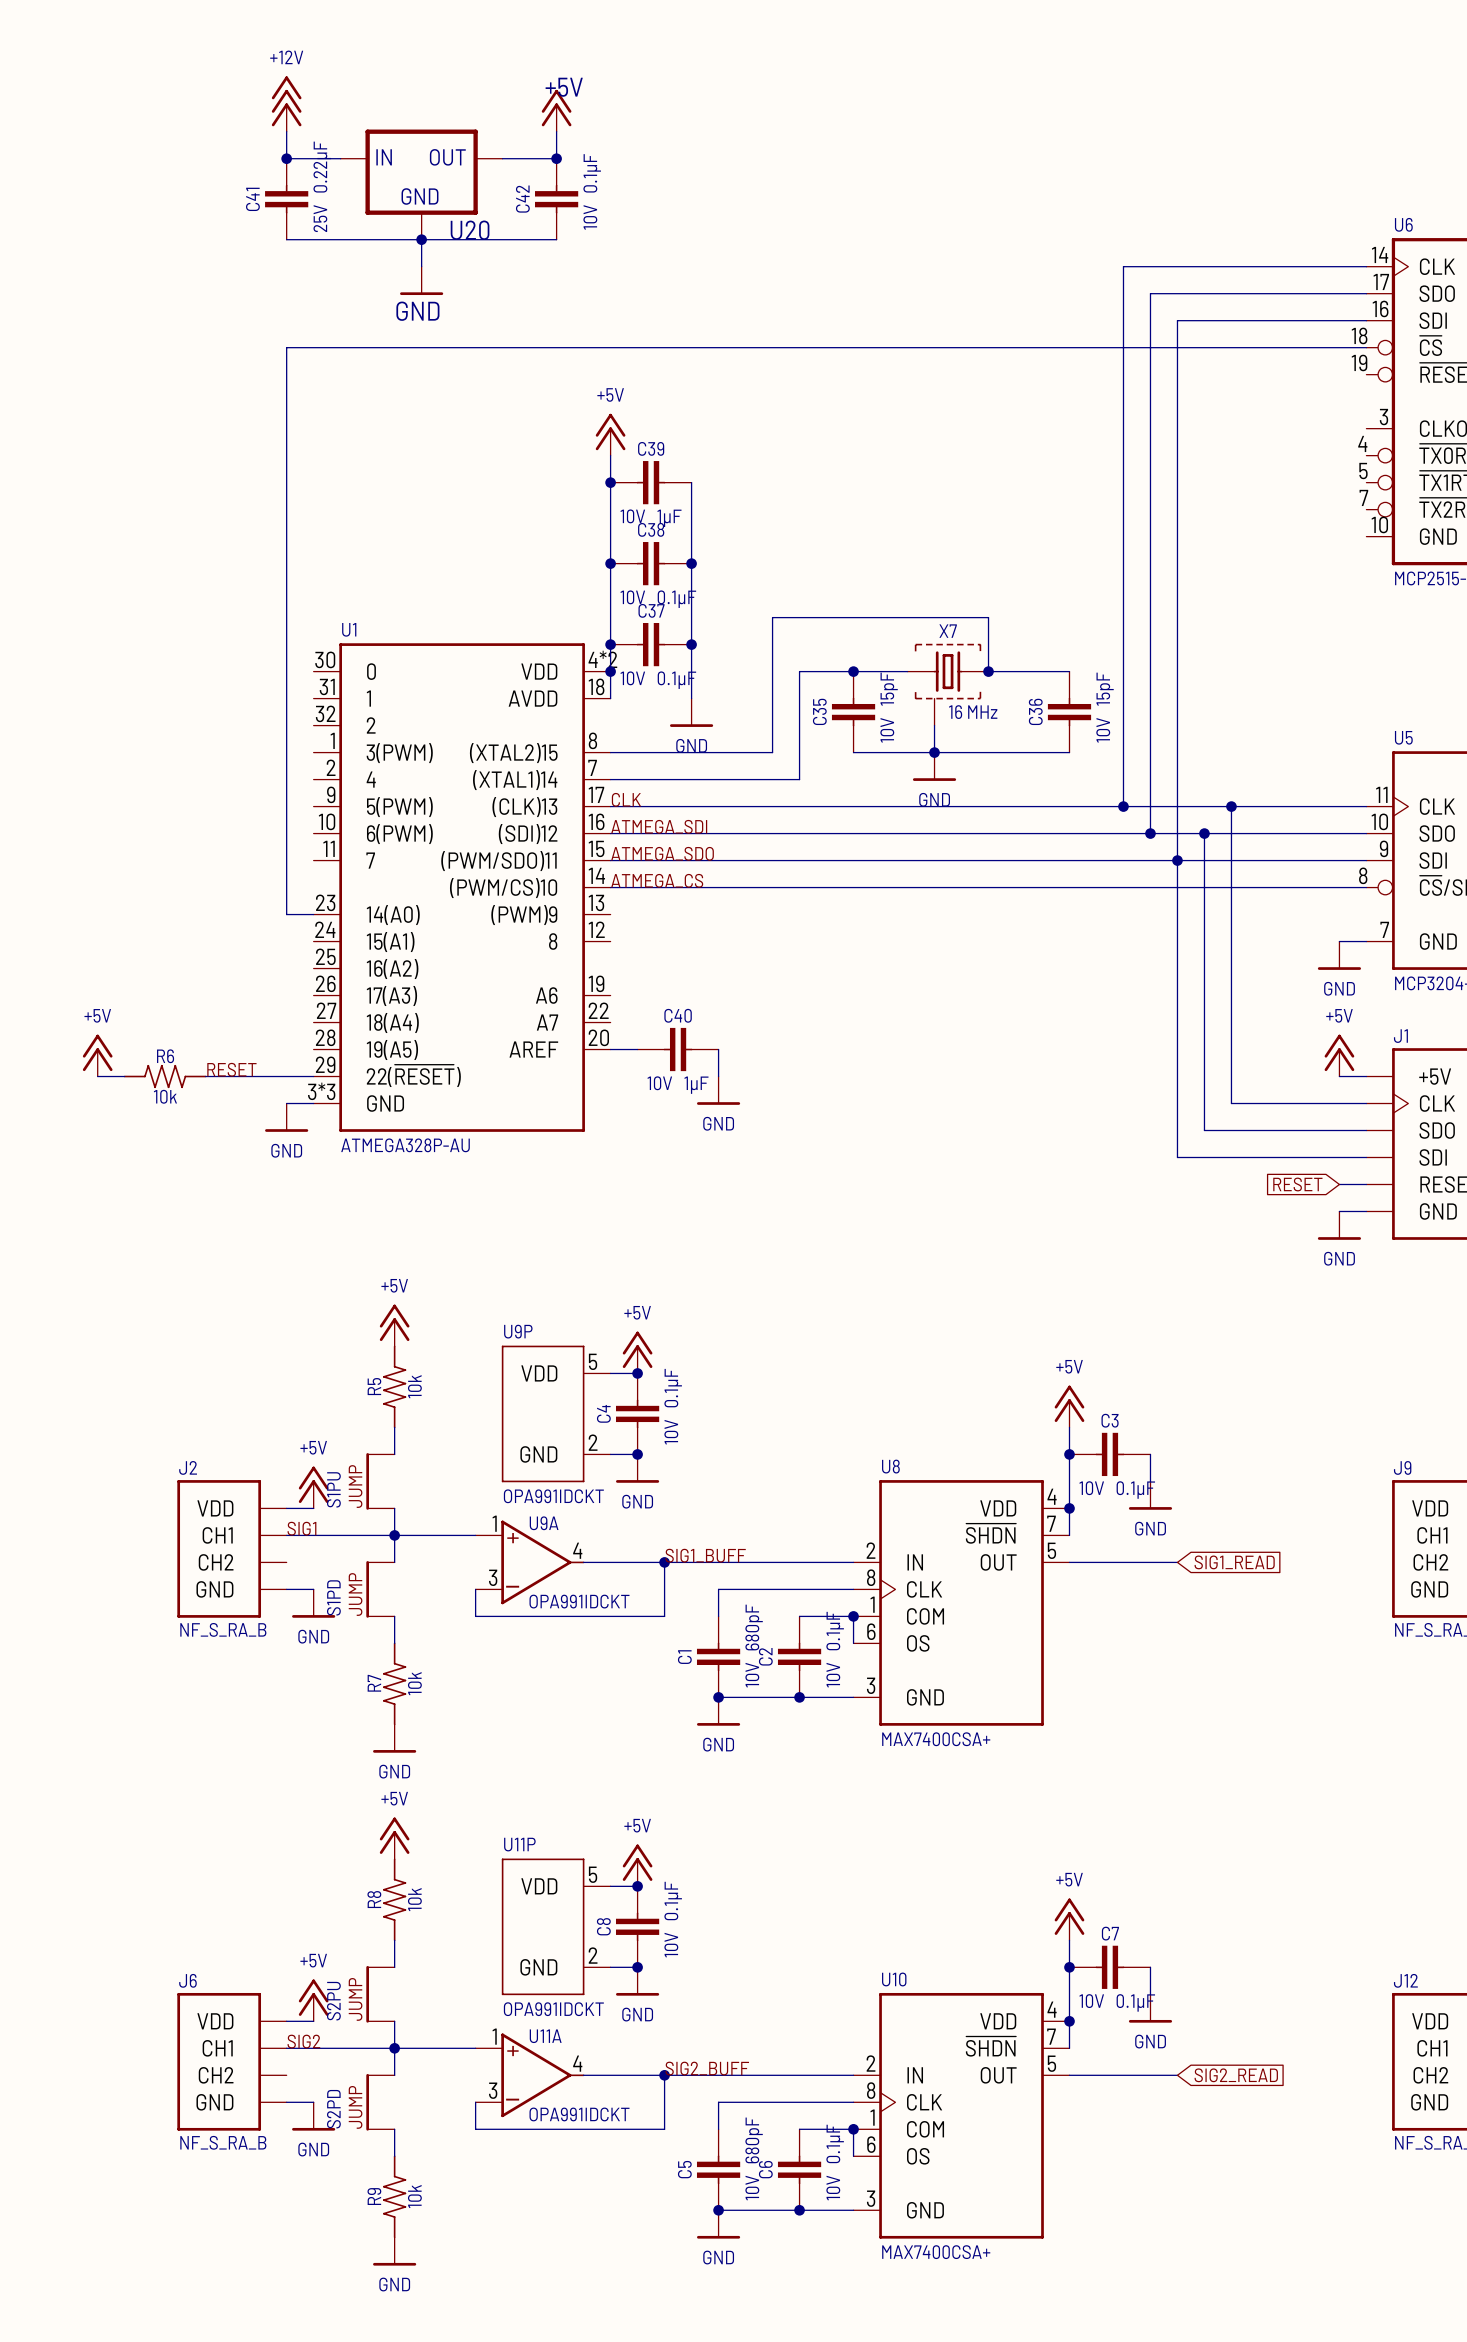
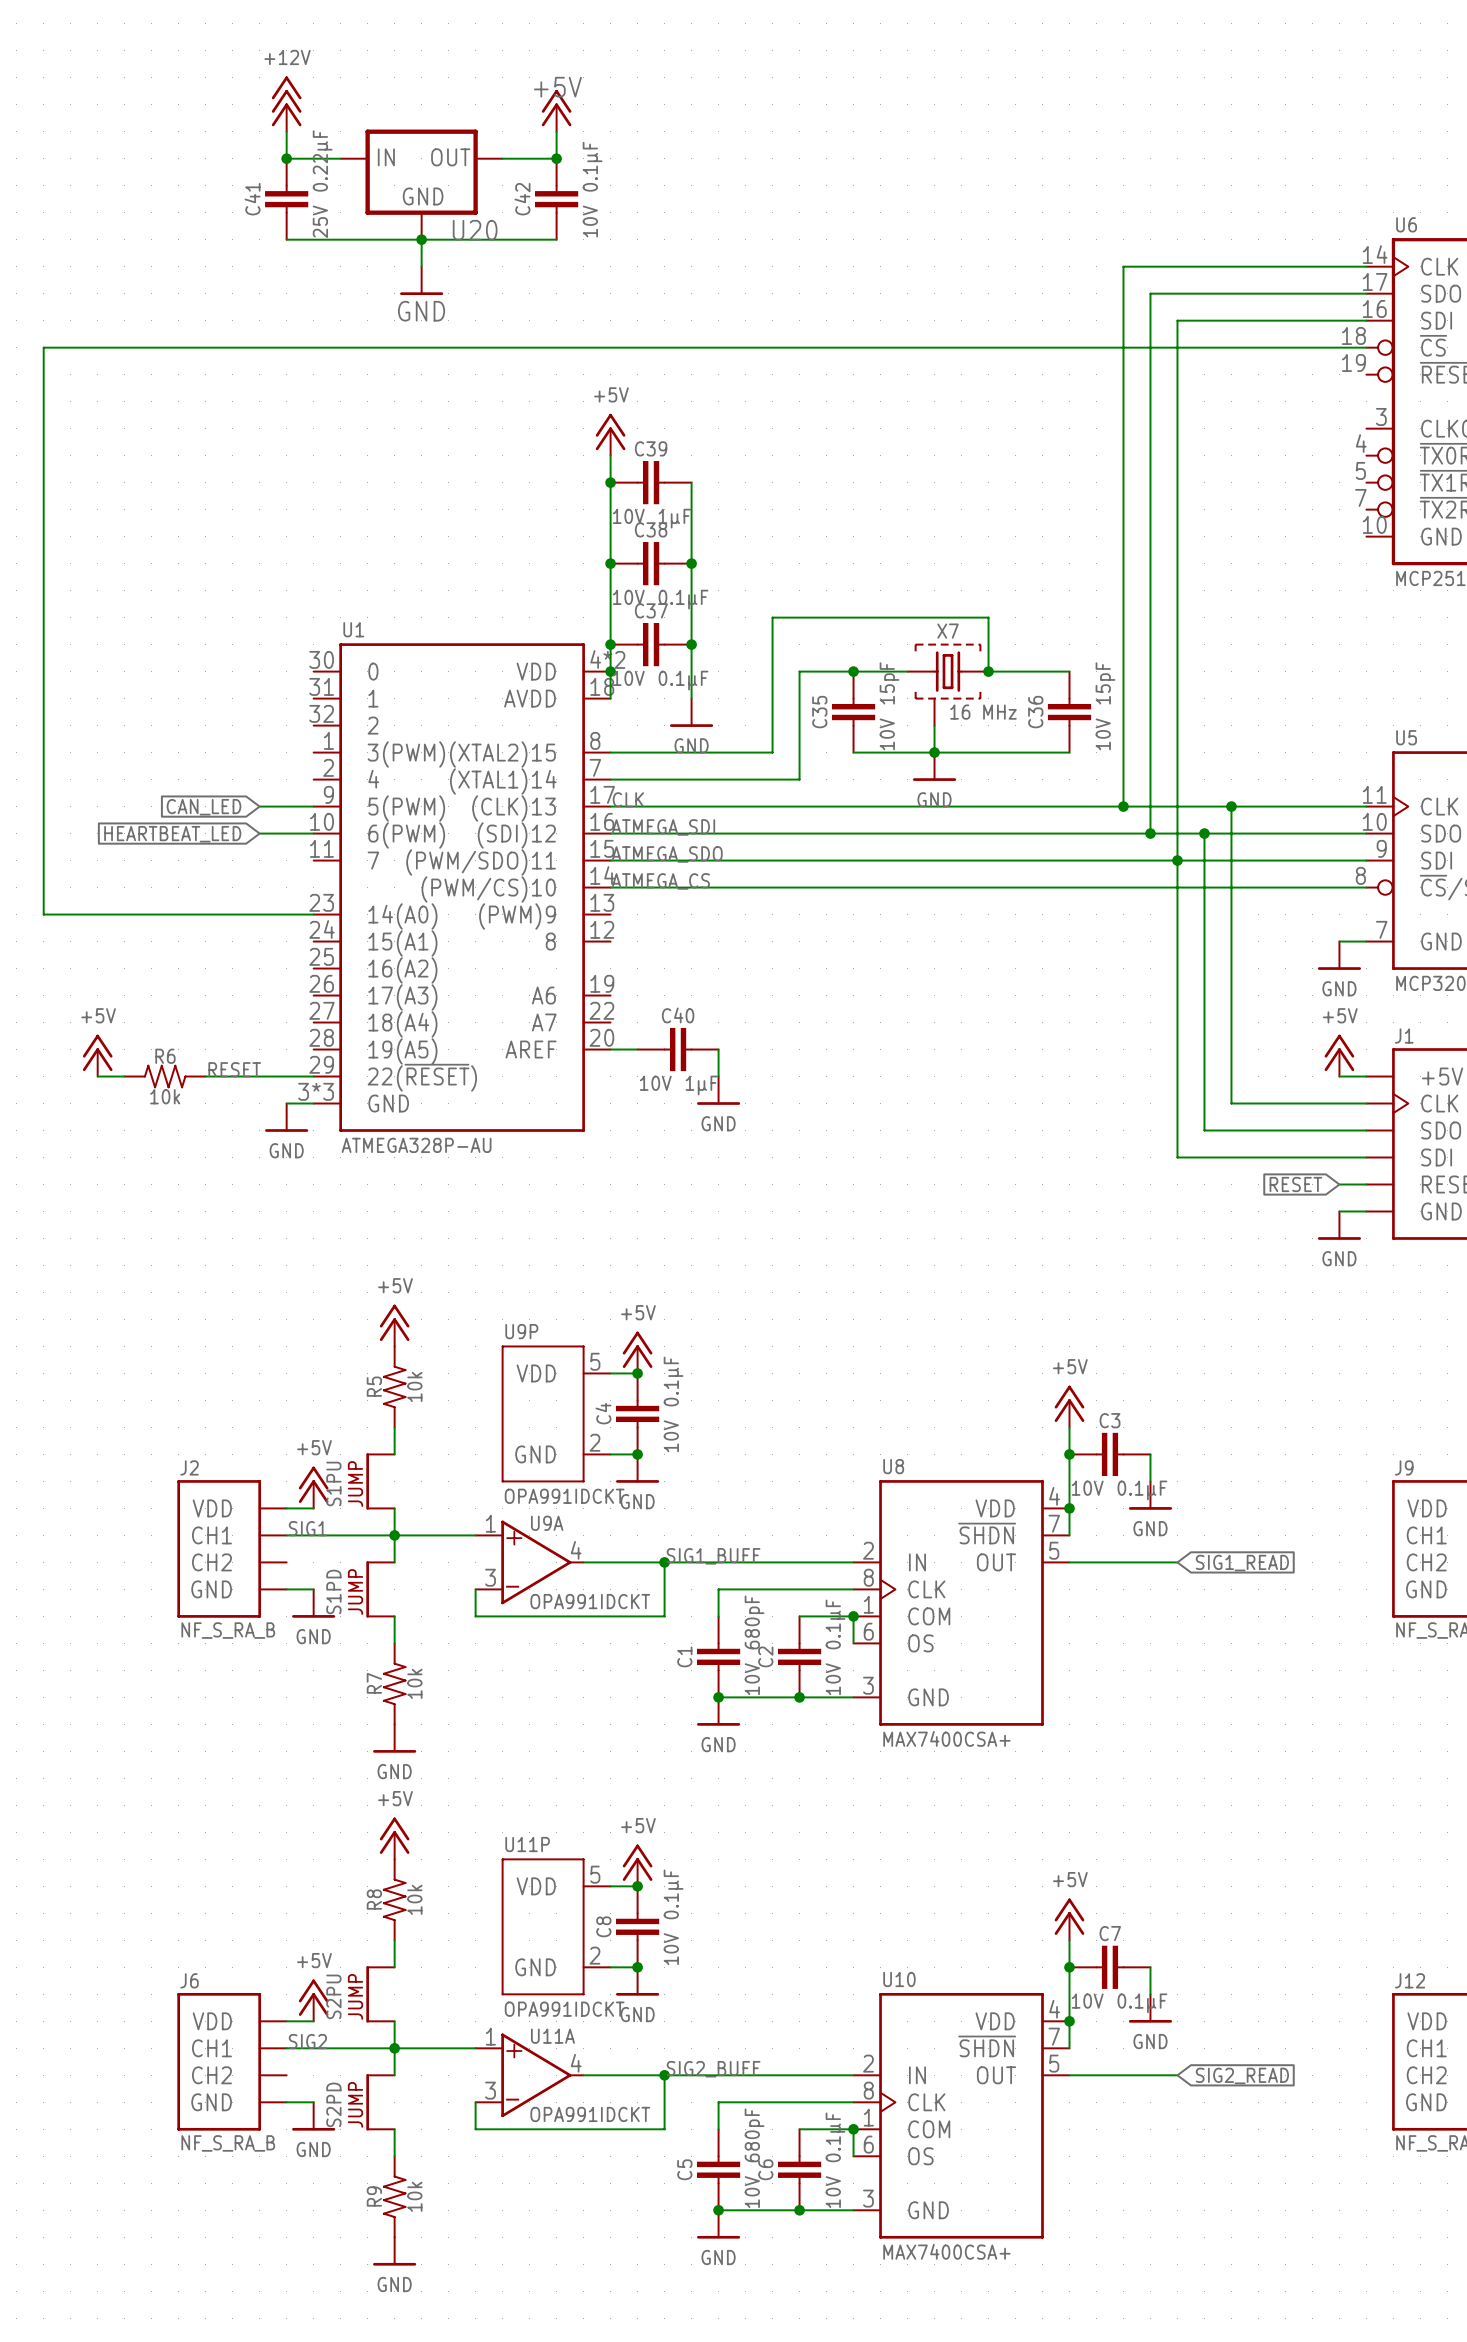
wire: (286, 347) (286, 914) -> (286, 347) (43, 347) (43, 914) (286, 914)
global label: none -> CAN_LED (203, 807)
wire: none -> (259, 806) (313, 806)
global label: none -> HEARTBEAT_LED (172, 834)
wire: none -> (259, 833) (313, 833)

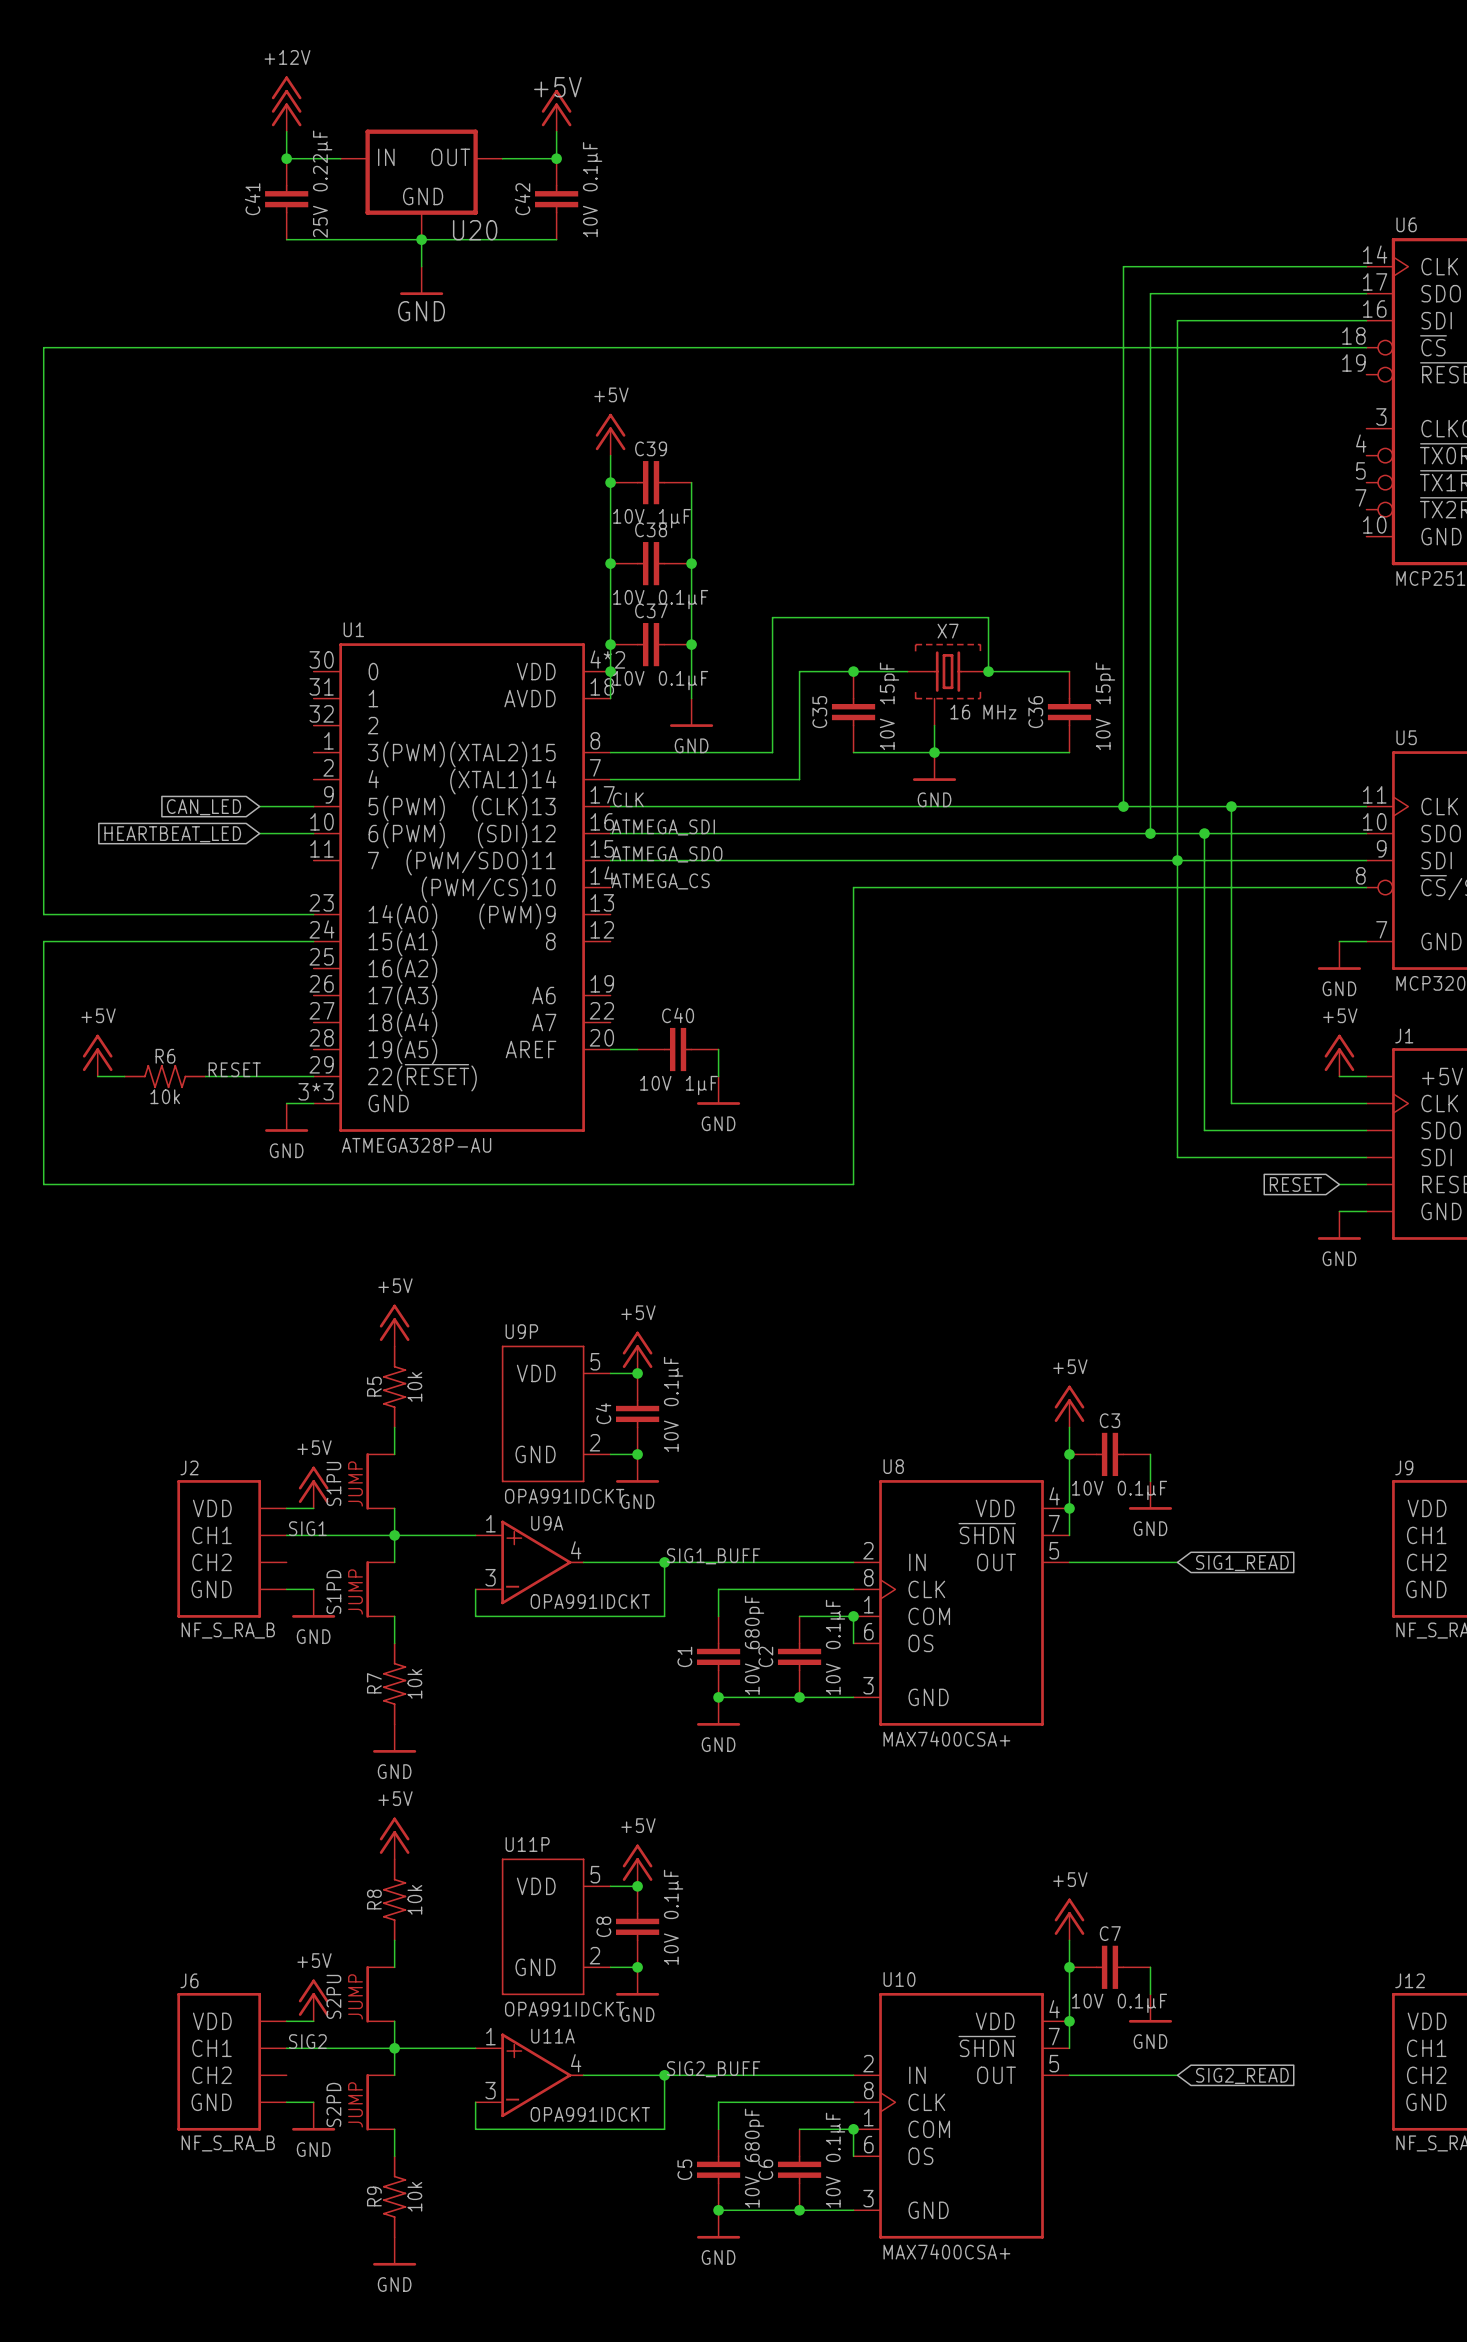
wire: (610, 887) (853, 887) -> (313, 941) (43, 941) (43, 1184) (853, 1184) (853, 887)

